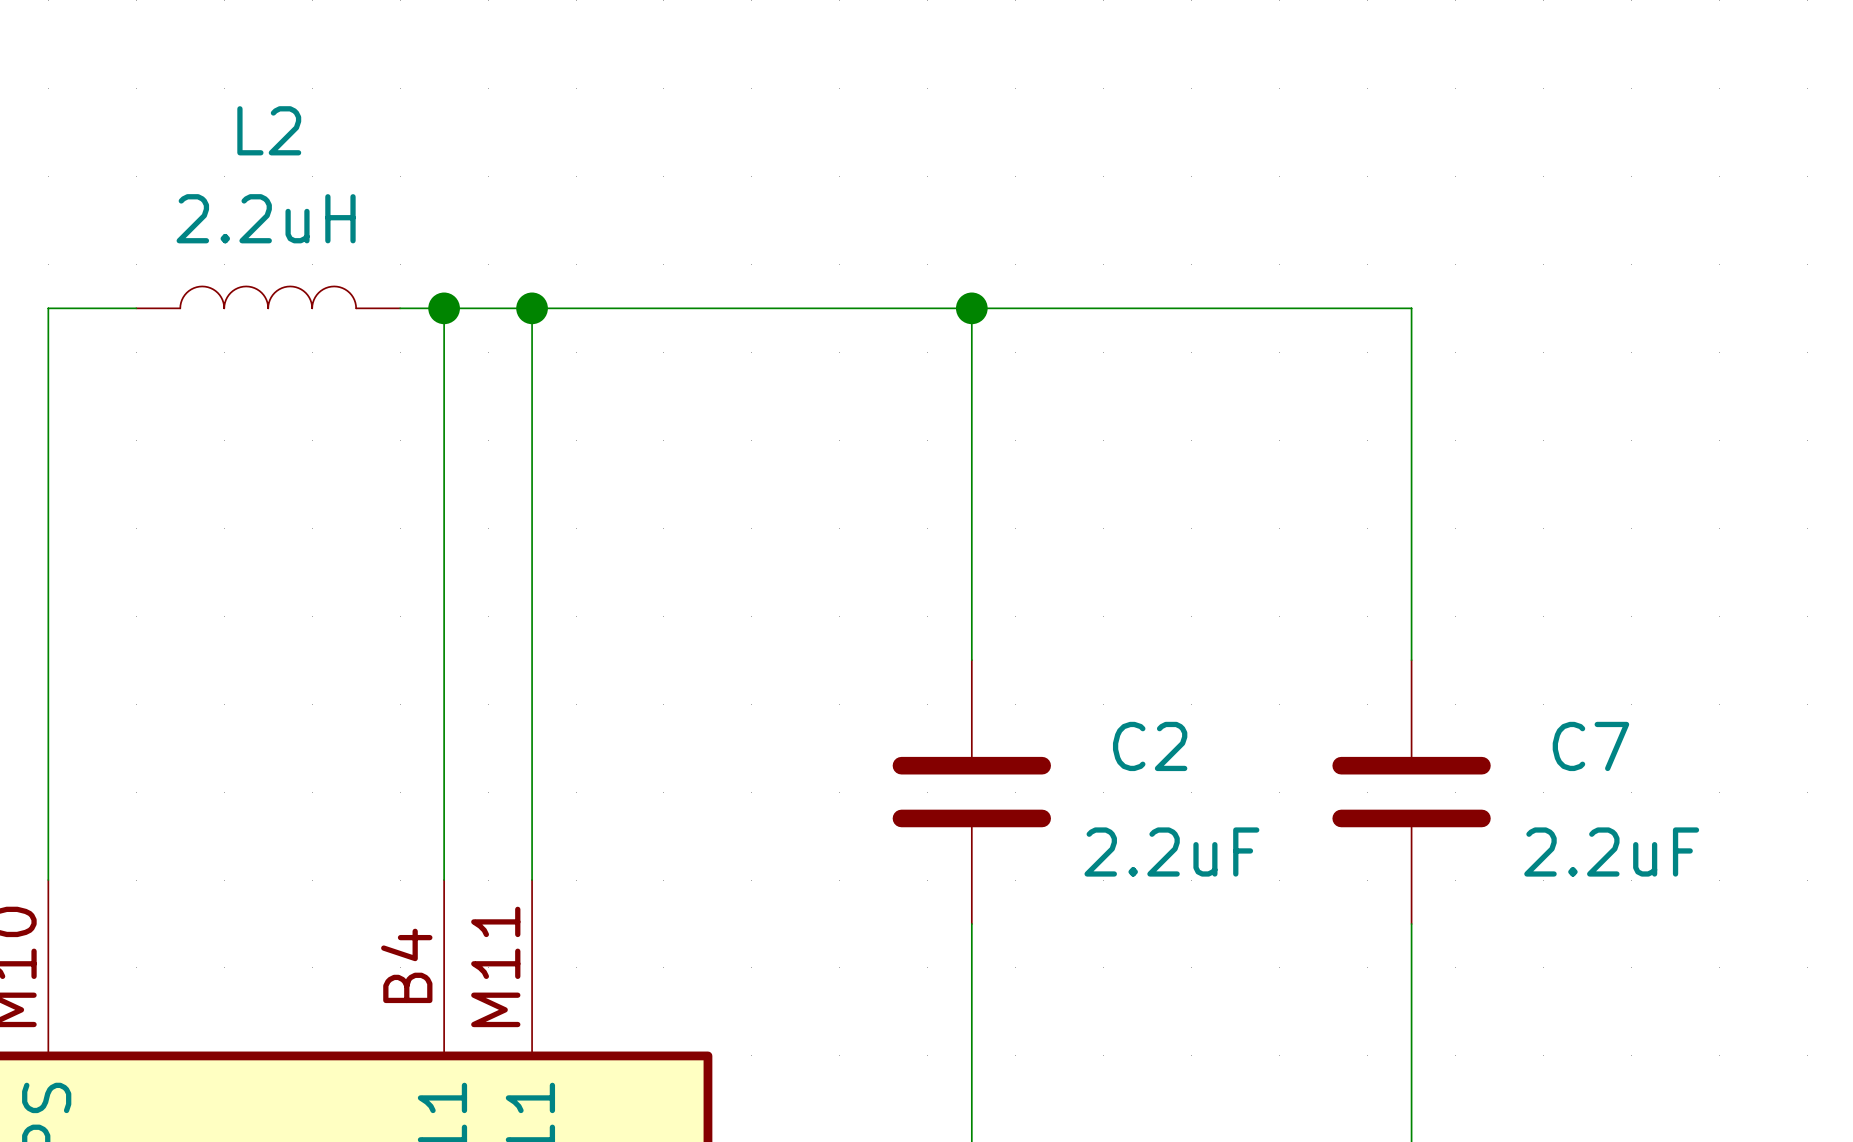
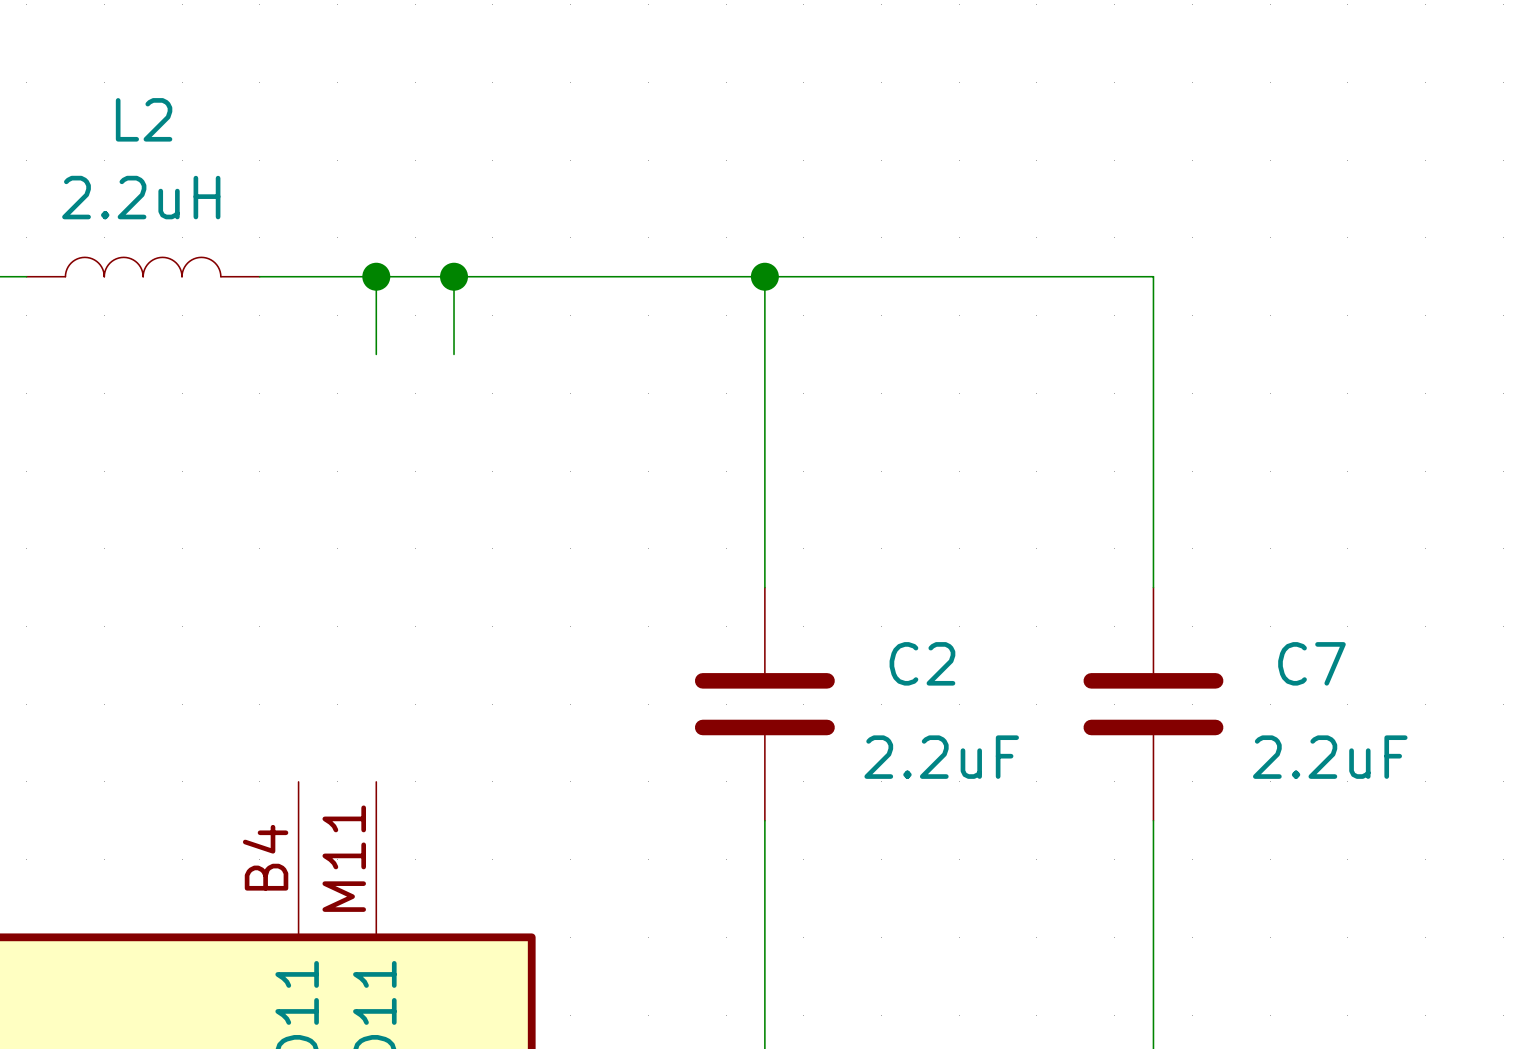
wire: (444, 308) (444, 880) -> none
junction position: (444, 308) -> (454, 276)
wire: none -> (454, 276) (454, 354)
wire: (532, 396) (532, 880) -> none

